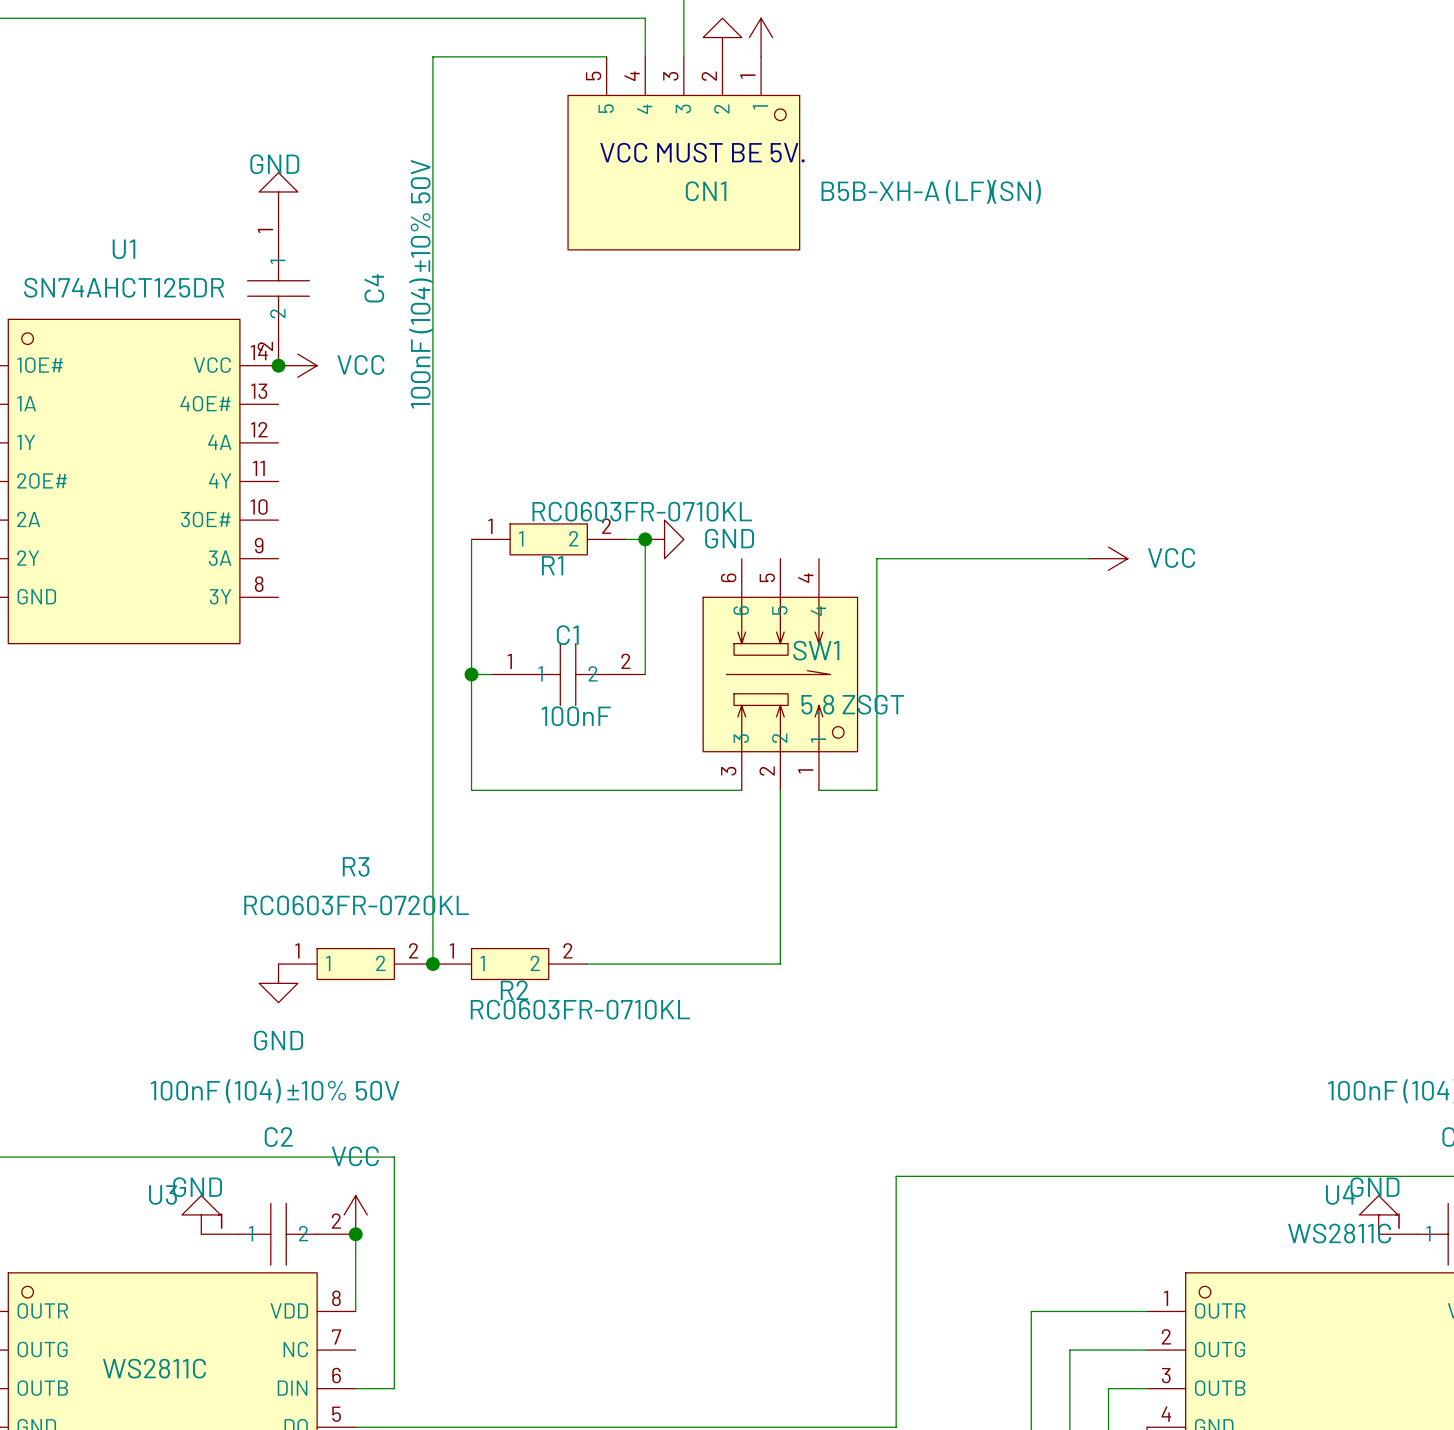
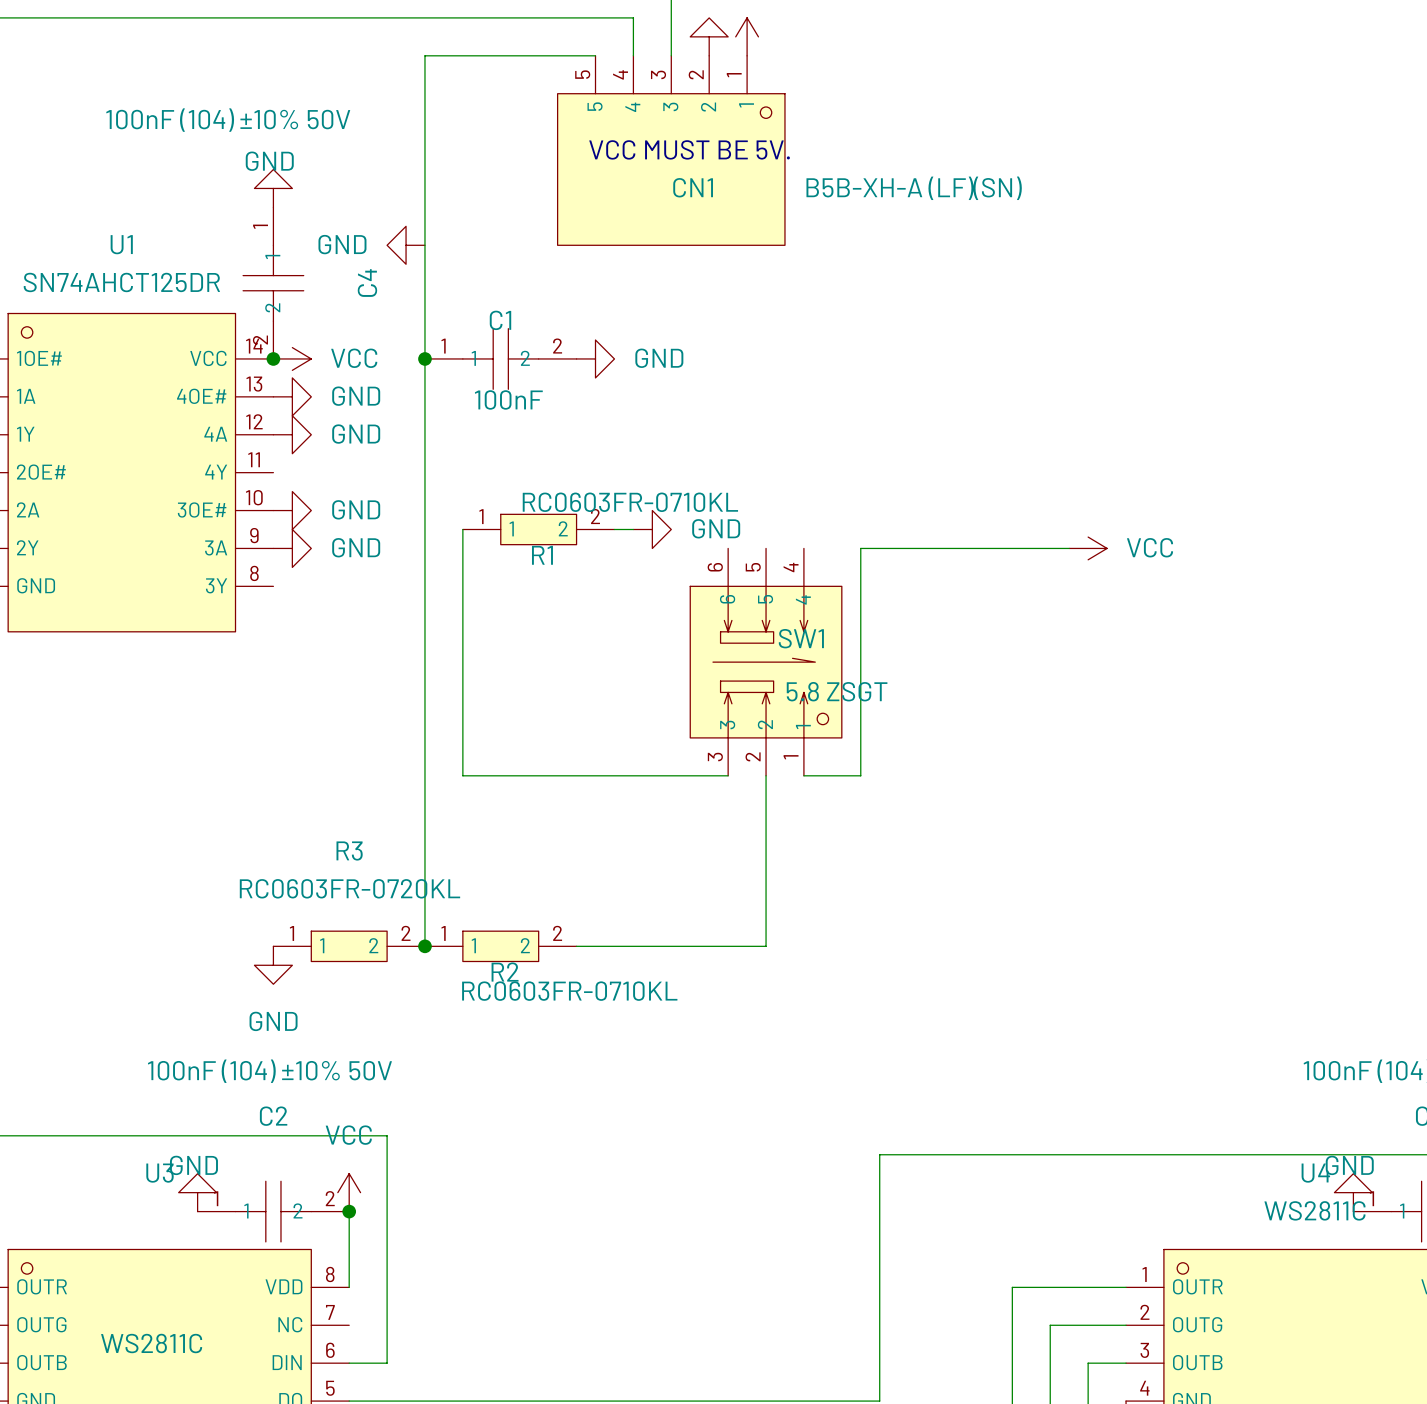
power symbol: none -> GND (406, 245)
C4 value rotation: 0° (421, 284) -> 90° clockwise (228, 120)
junction: none -> (424, 358)
power symbol: none -> GND (595, 358)
power symbol: none -> GND (292, 396)
power symbol: none -> GND (292, 434)
power symbol: none -> GND (292, 510)
wire: (645, 539) (645, 674) -> none
junction: (645, 539) -> none
power symbol: none -> GND (292, 548)
wire: (471, 674) (490, 674) -> none
junction: (471, 674) -> none
C1 position: (568, 674) -> (500, 358)

